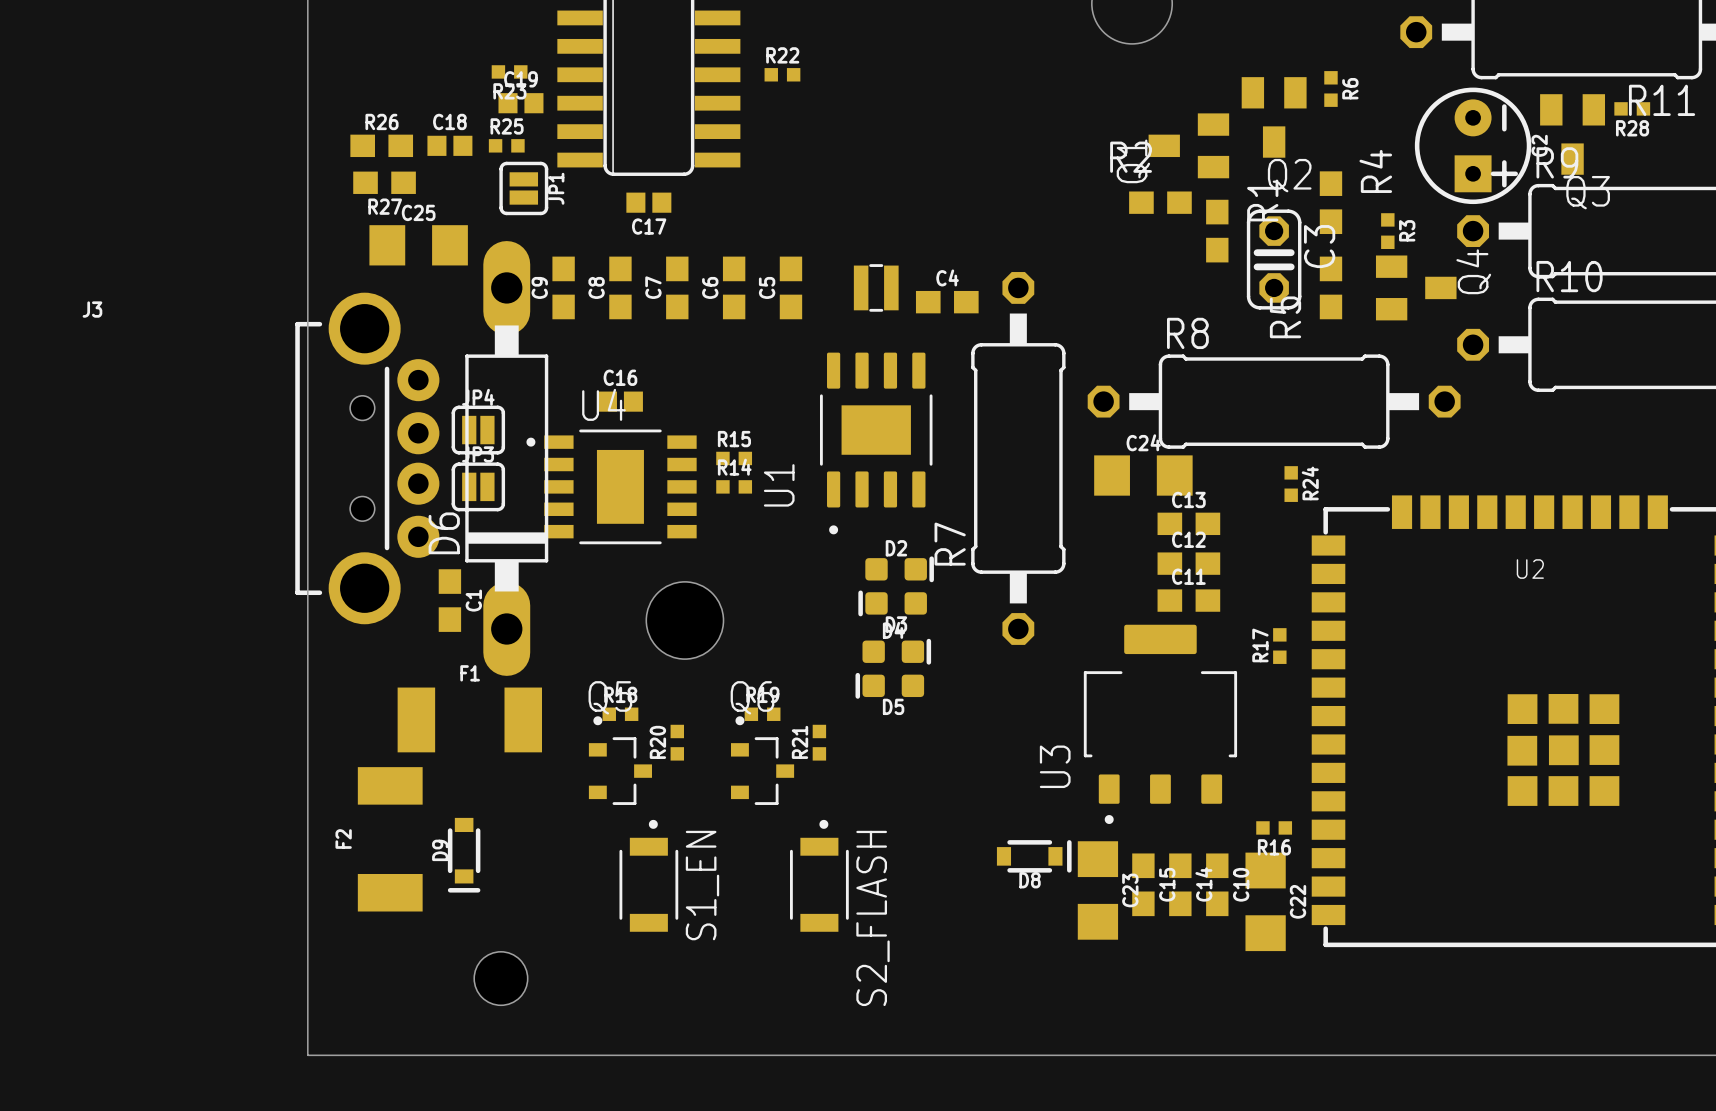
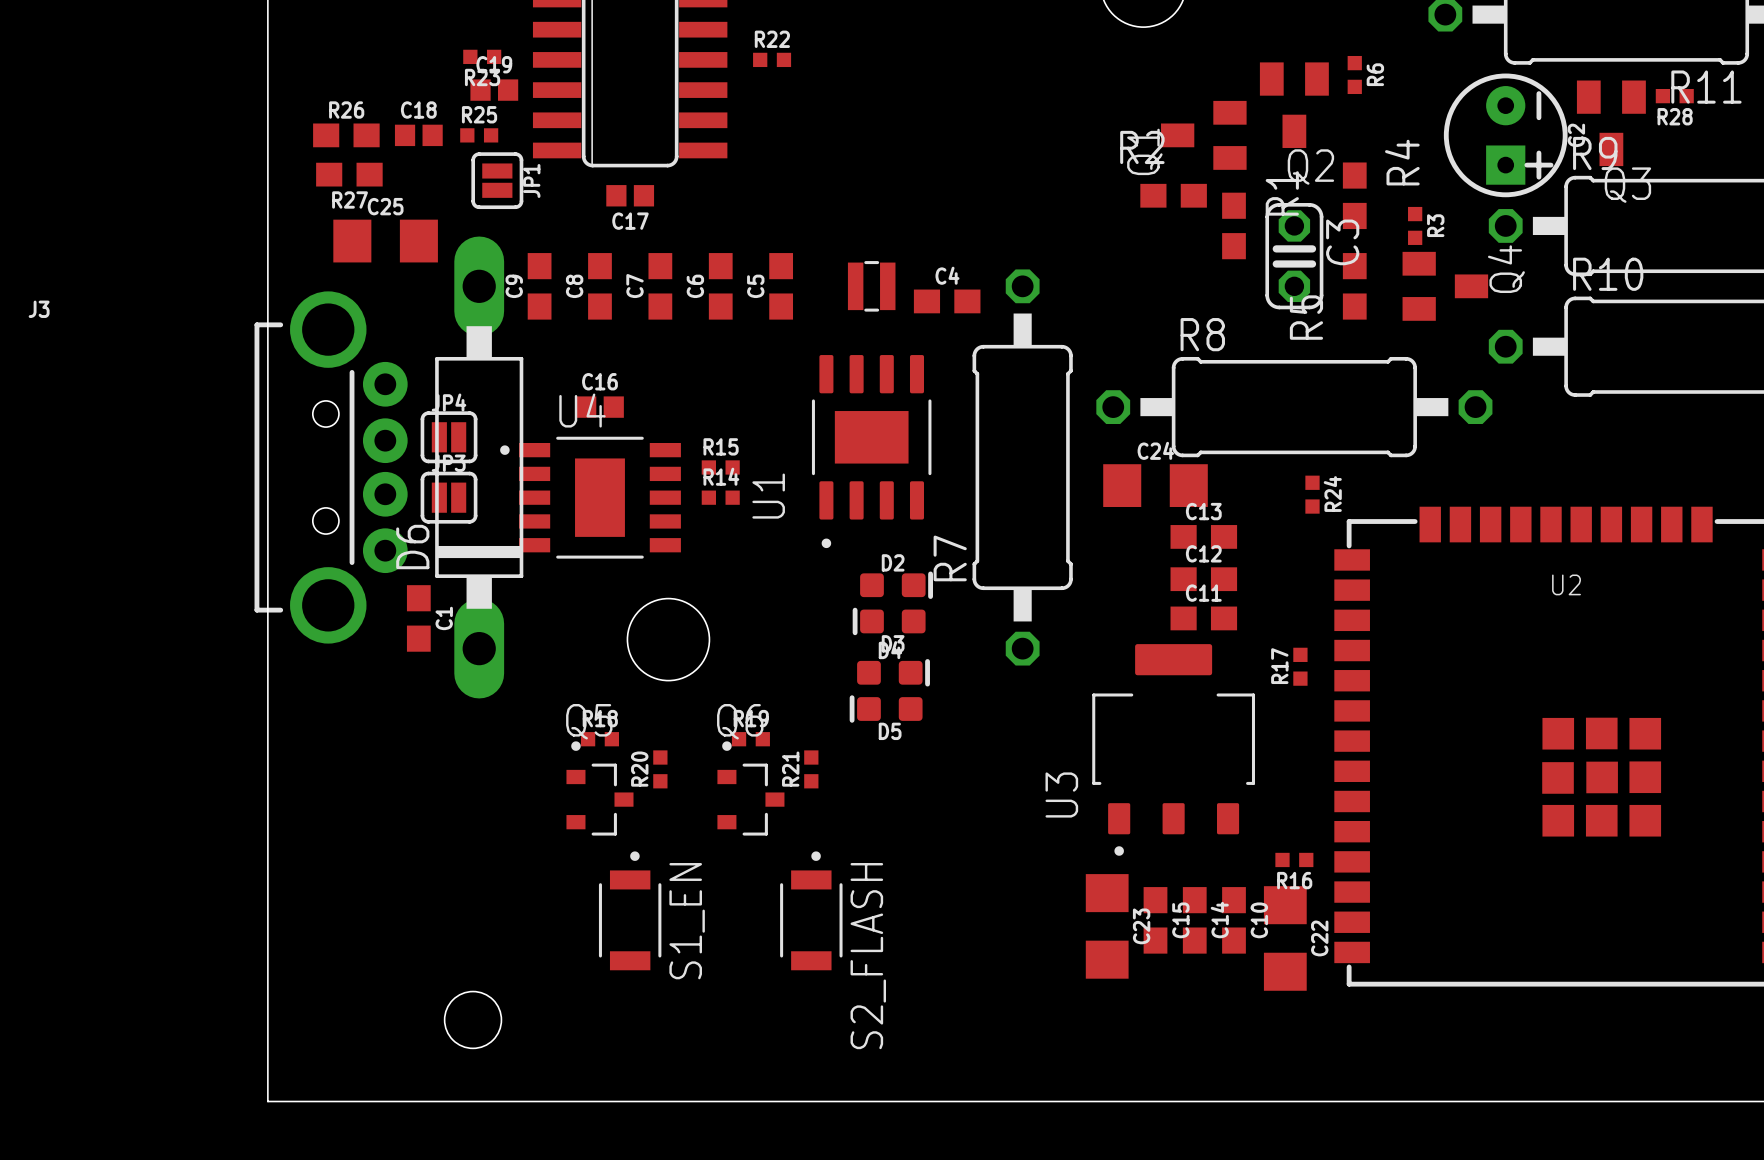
F1: (469, 719) -> none
F2: (390, 839) -> none
D9: (464, 855) -> none
D8: (1034, 856) -> none

